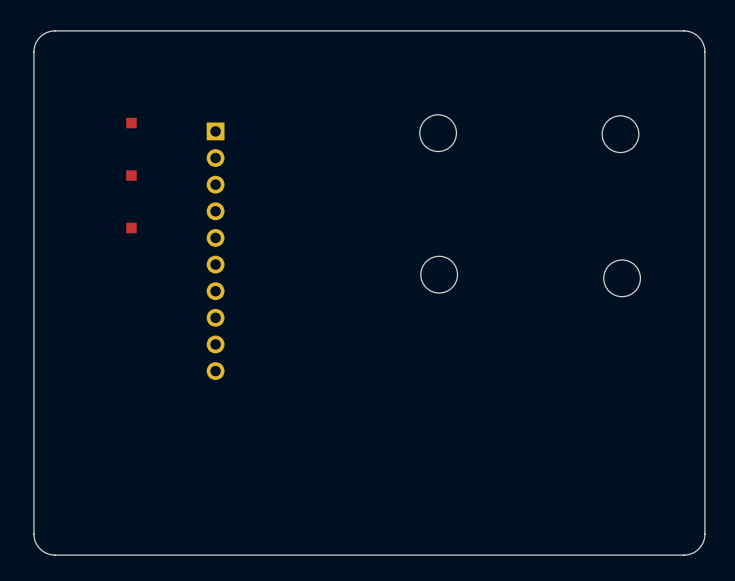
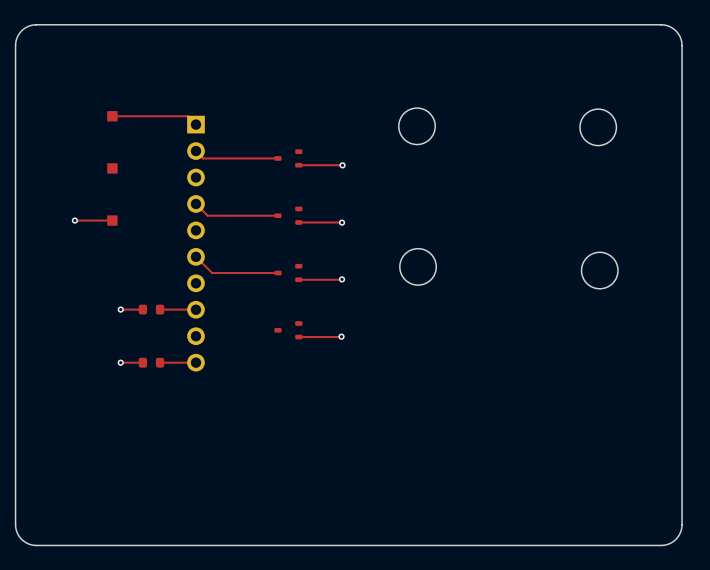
top track: none -> (112, 116) (187, 116) (195, 124)
top track: none -> (195, 151) (203, 158) (277, 158)
part: none -> (288, 158)
top track: none -> (298, 165) (342, 165)
via: none -> (342, 165)
top track: none -> (195, 203) (207, 215) (277, 215)
part: none -> (288, 215)
via: none -> (74, 220)
top track: none -> (112, 220) (74, 220)
top track: none -> (298, 222) (342, 222)
via: none -> (342, 222)
top track: none -> (195, 256) (212, 273) (277, 273)
part: none -> (288, 273)
top track: none -> (342, 279) (298, 279)
via: none -> (342, 279)
via: none -> (120, 309)
top track: none -> (142, 309) (120, 309)
part: none -> (151, 309)
top track: none -> (160, 309) (195, 309)
part: none -> (288, 330)
top track: none -> (341, 336) (298, 337)
via: none -> (341, 336)
via: none -> (120, 362)
top track: none -> (142, 362) (120, 362)
part: none -> (151, 362)
top track: none -> (195, 362) (160, 362)

